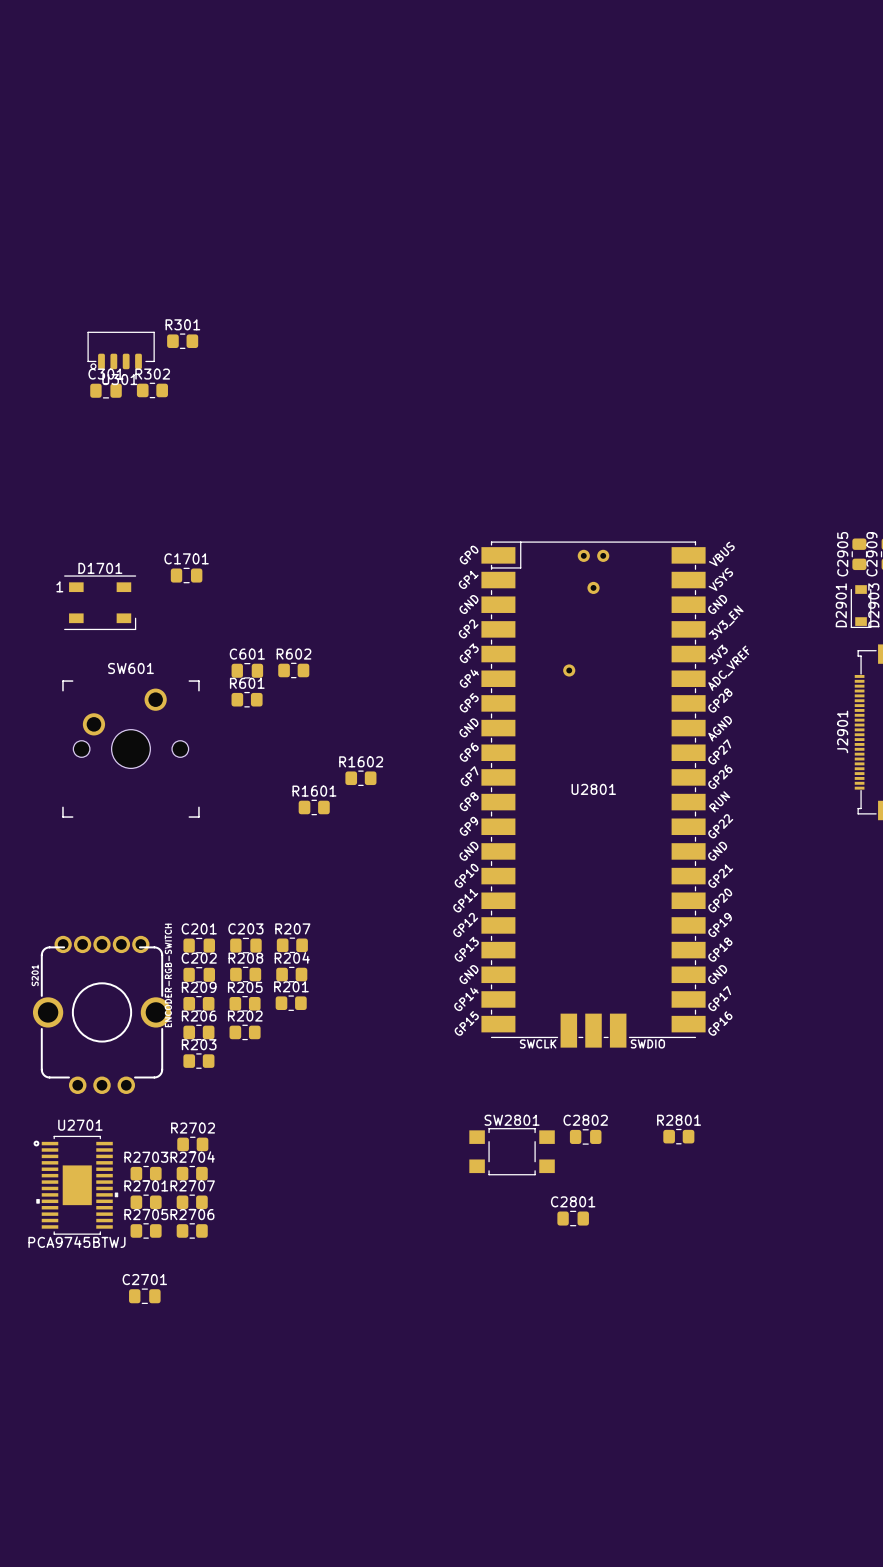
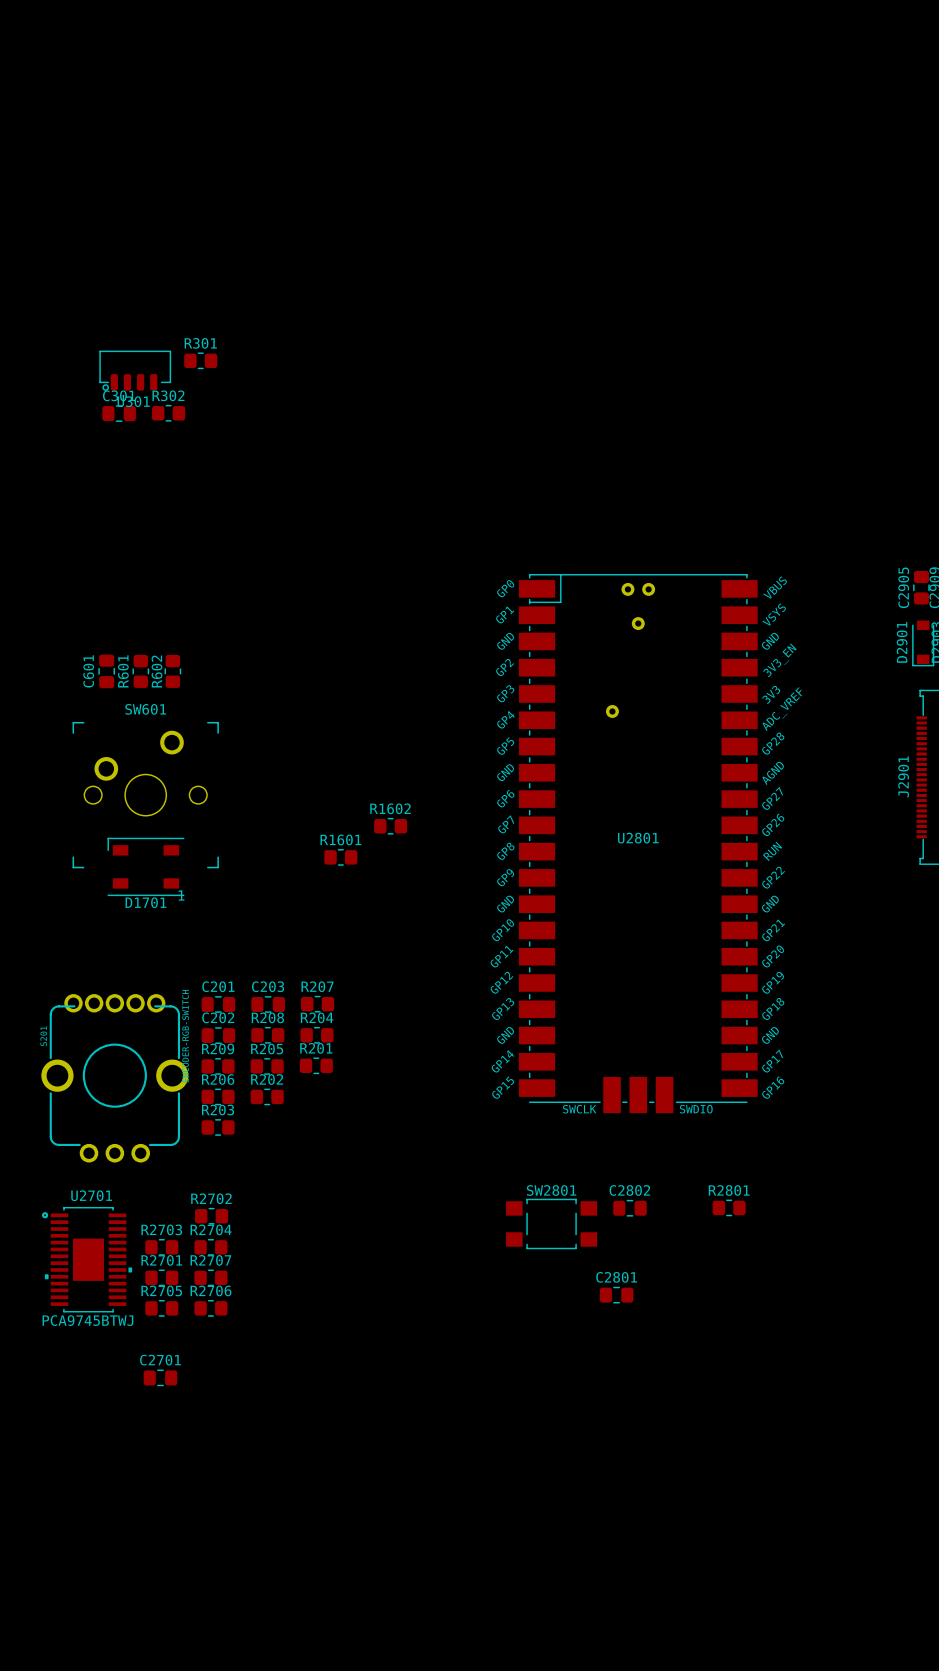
D1701 name position: D1701 (100, 568) -> D1701 (145, 902)
D1701 footprint: [64, 575, 137, 631] -> [107, 837, 185, 896]
C1701: (186, 575) -> none
C601 name position: C601 (247, 654) -> C601 (88, 671)
R602 name position: R602 (294, 654) -> R602 (156, 671)
C601 rotation: 0° (247, 670) -> 90° clockwise (106, 671)
C601 position: (247, 670) -> (106, 671)
R602 rotation: 0° (293, 670) -> 90° clockwise (172, 671)
R602 position: (293, 670) -> (172, 671)
R601 name position: R601 (247, 683) -> R601 (123, 671)
R601 rotation: 0° (247, 699) -> 90° clockwise (140, 671)
R601 position: (247, 699) -> (140, 671)

